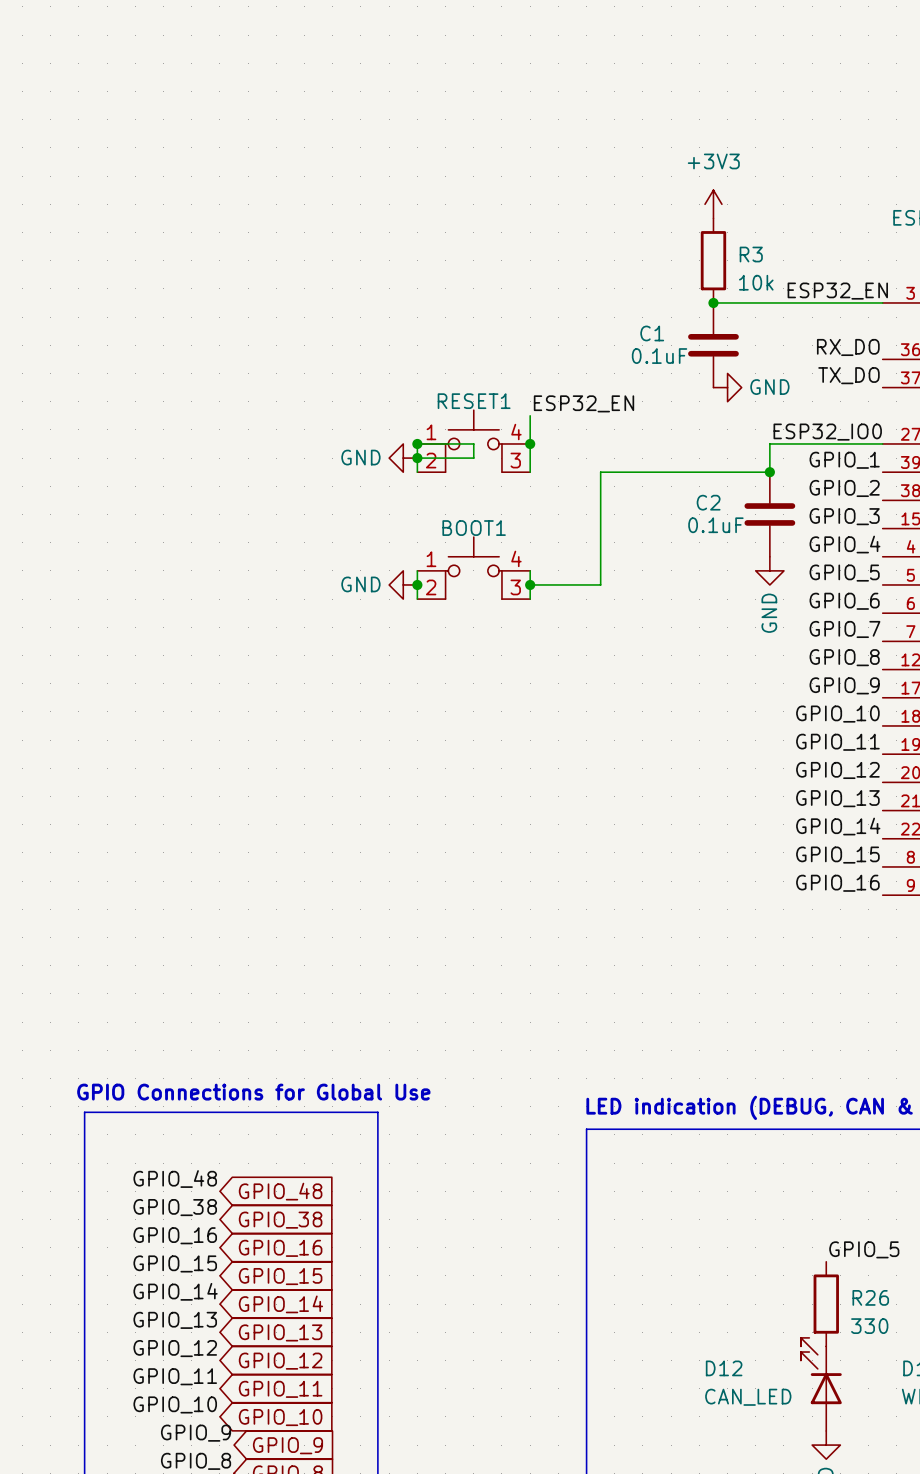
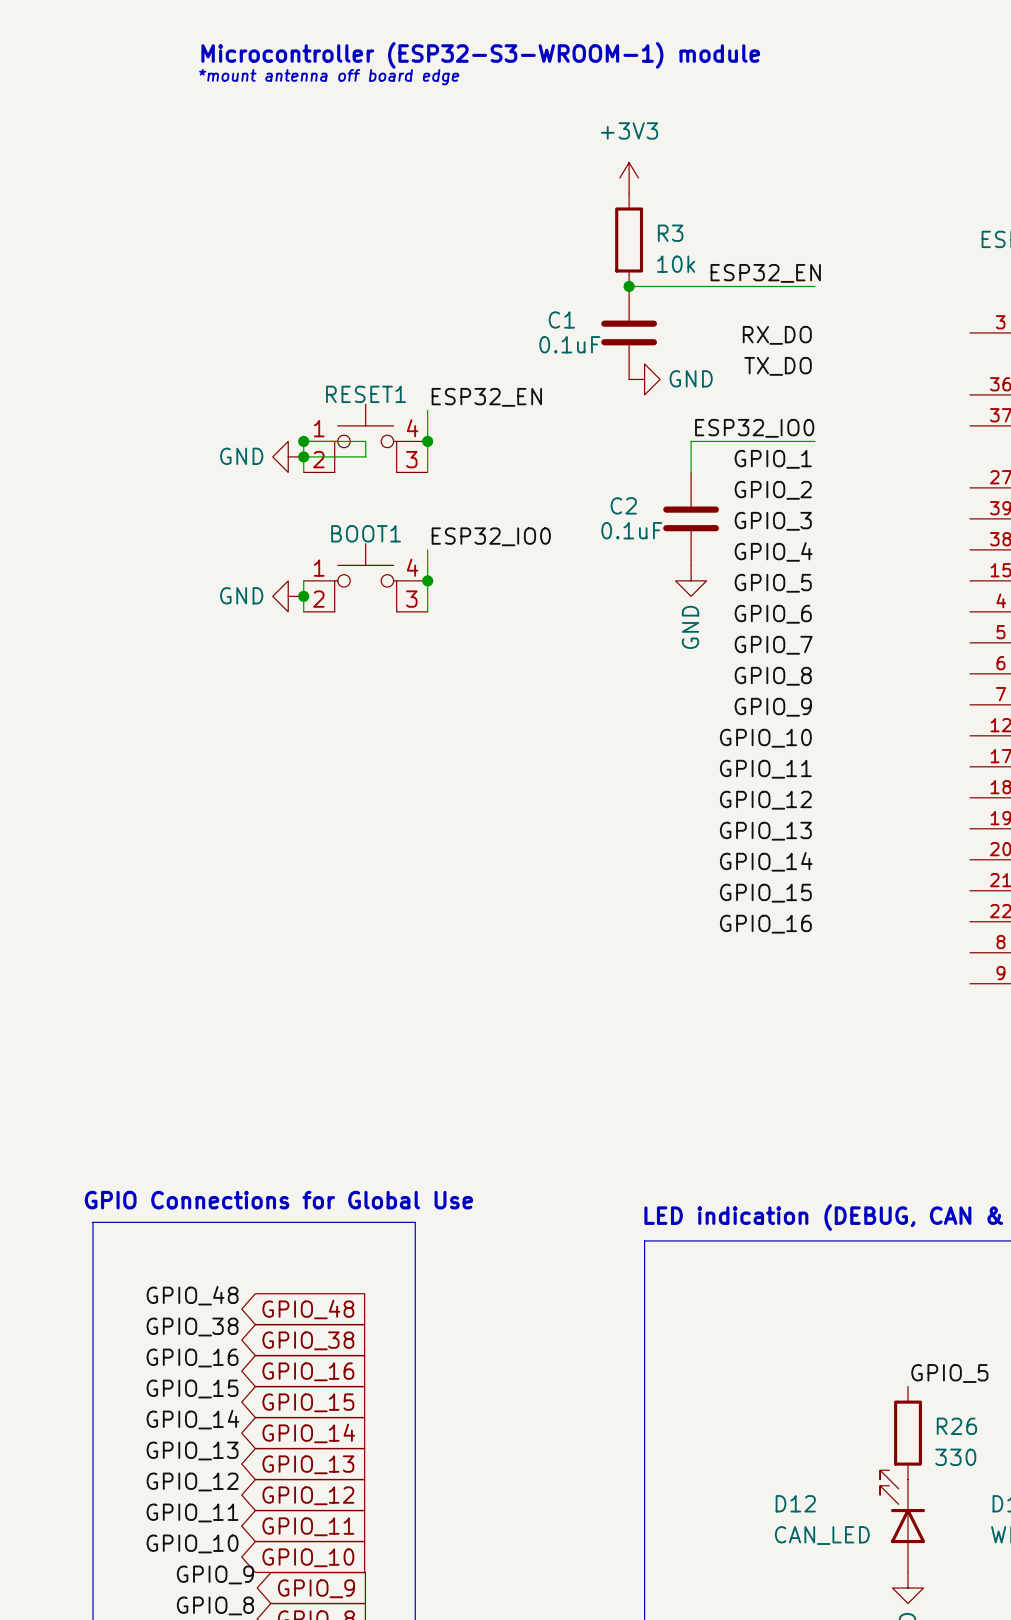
text: none -> Microcontroller (ESP32-S3-WROOM-1) module (480, 55)
text: none -> *mount antenna off board edge (329, 77)
power symbol position: +3V3 (713, 204) -> +3V3 (629, 178)
label: none -> ESP32_EN (765, 273)
junction: none -> (629, 286)
R3 position: (713, 260) -> (629, 239)
label: ESP32_EN (837, 291) -> none
wire: (713, 302) (882, 302) -> (629, 286) (815, 286)
junction: (713, 302) -> none
power symbol: none -> GND (644, 379)
C1 position: (713, 345) -> (629, 332)
label position: RX_DO (848, 347) -> RX_DO (777, 335)
label: none -> ESP32_EN (486, 397)
label position: TX_DO (848, 375) -> TX_DO (778, 366)
power symbol: GND (727, 387) -> none
junction: none -> (303, 441)
junction: none -> (427, 441)
wire: none -> (815, 441) (691, 441) (691, 472)
label: ESP32_EN (583, 403) -> none
power symbol: none -> GND (288, 456)
junction: none -> (303, 456)
wire: (530, 415) (530, 472) -> (427, 410) (427, 472)
label position: ESP32_IO0 (827, 432) -> ESP32_IO0 (754, 428)
RESET1 position: (473, 441) -> (365, 438)
junction: (417, 443) -> none
junction: (530, 443) -> none
wire: (882, 443) (769, 443) (769, 472) (600, 472) (600, 584) (530, 584) -> none
power symbol: GND (403, 458) -> none
wire: (417, 458) (473, 458) (473, 443) (417, 443) (417, 472) -> (303, 456) (365, 456) (365, 441) (303, 441) (303, 472)
junction: (417, 458) -> none
label position: GPIO_1 (844, 460) -> GPIO_1 (773, 459)
junction: (769, 472) -> none
label: none -> ESP32_IO0 (491, 536)
label position: GPIO_2 (844, 488) -> GPIO_2 (773, 490)
wire: none -> (427, 549) (427, 611)
C2 position: (769, 514) -> (691, 518)
label position: GPIO_3 (844, 516) -> GPIO_3 (773, 521)
junction: none -> (427, 580)
power symbol: none -> GND (691, 580)
power symbol: none -> GND (288, 596)
junction: none -> (303, 596)
label position: GPIO_4 (844, 544) -> GPIO_4 (773, 551)
BOOT1 position: (473, 568) -> (365, 577)
wire: (417, 570) (417, 599) -> (303, 580) (303, 611)
wire: (530, 570) (530, 599) -> none
power symbol: GND (769, 570) -> none
label position: GPIO_5 (844, 573) -> GPIO_5 (773, 583)
power symbol: GND (403, 584) -> none
junction: (417, 584) -> none
junction: (530, 584) -> none
label position: GPIO_6 (844, 601) -> GPIO_6 (773, 614)
label position: GPIO_7 (844, 629) -> GPIO_7 (773, 645)
label position: GPIO_8 (844, 657) -> GPIO_8 (773, 676)
label position: GPIO_9 (844, 685) -> GPIO_9 (773, 707)
label position: GPIO_10 (837, 714) -> GPIO_10 (765, 738)
label position: GPIO_11 (837, 742) -> GPIO_11 (765, 769)
label position: GPIO_12 (837, 770) -> GPIO_12 (765, 800)
label position: GPIO_13 (837, 798) -> GPIO_13 (765, 831)
label position: GPIO_14 (838, 826) -> GPIO_14 (766, 861)
label position: GPIO_15 (837, 855) -> GPIO_15 (765, 893)
label position: GPIO_16 (837, 883) -> GPIO_16 (765, 924)

